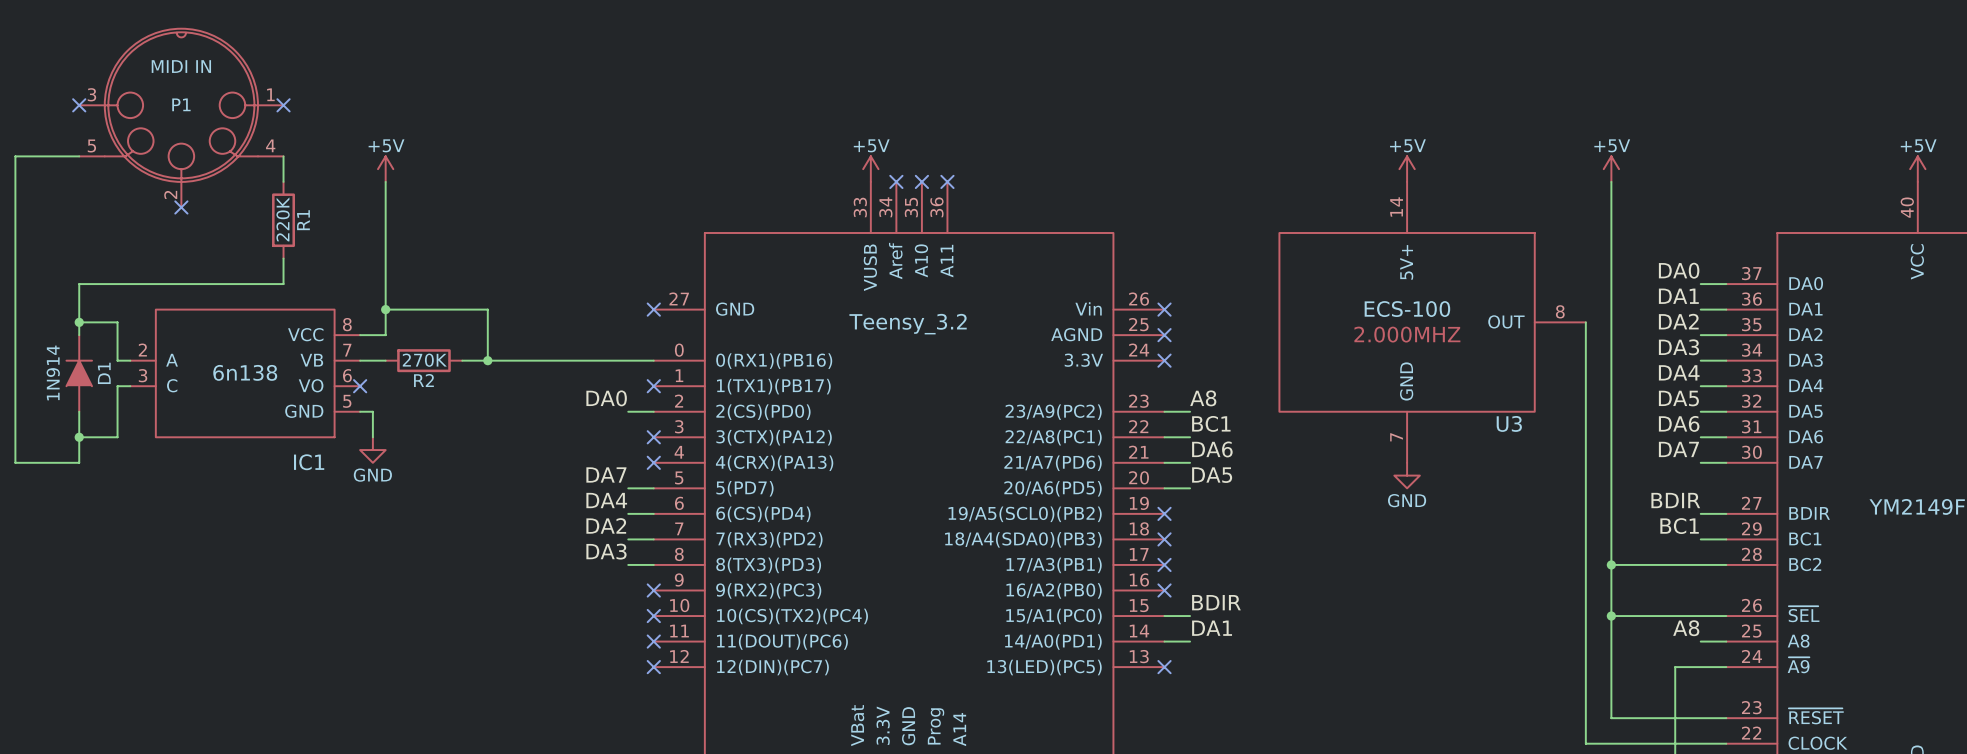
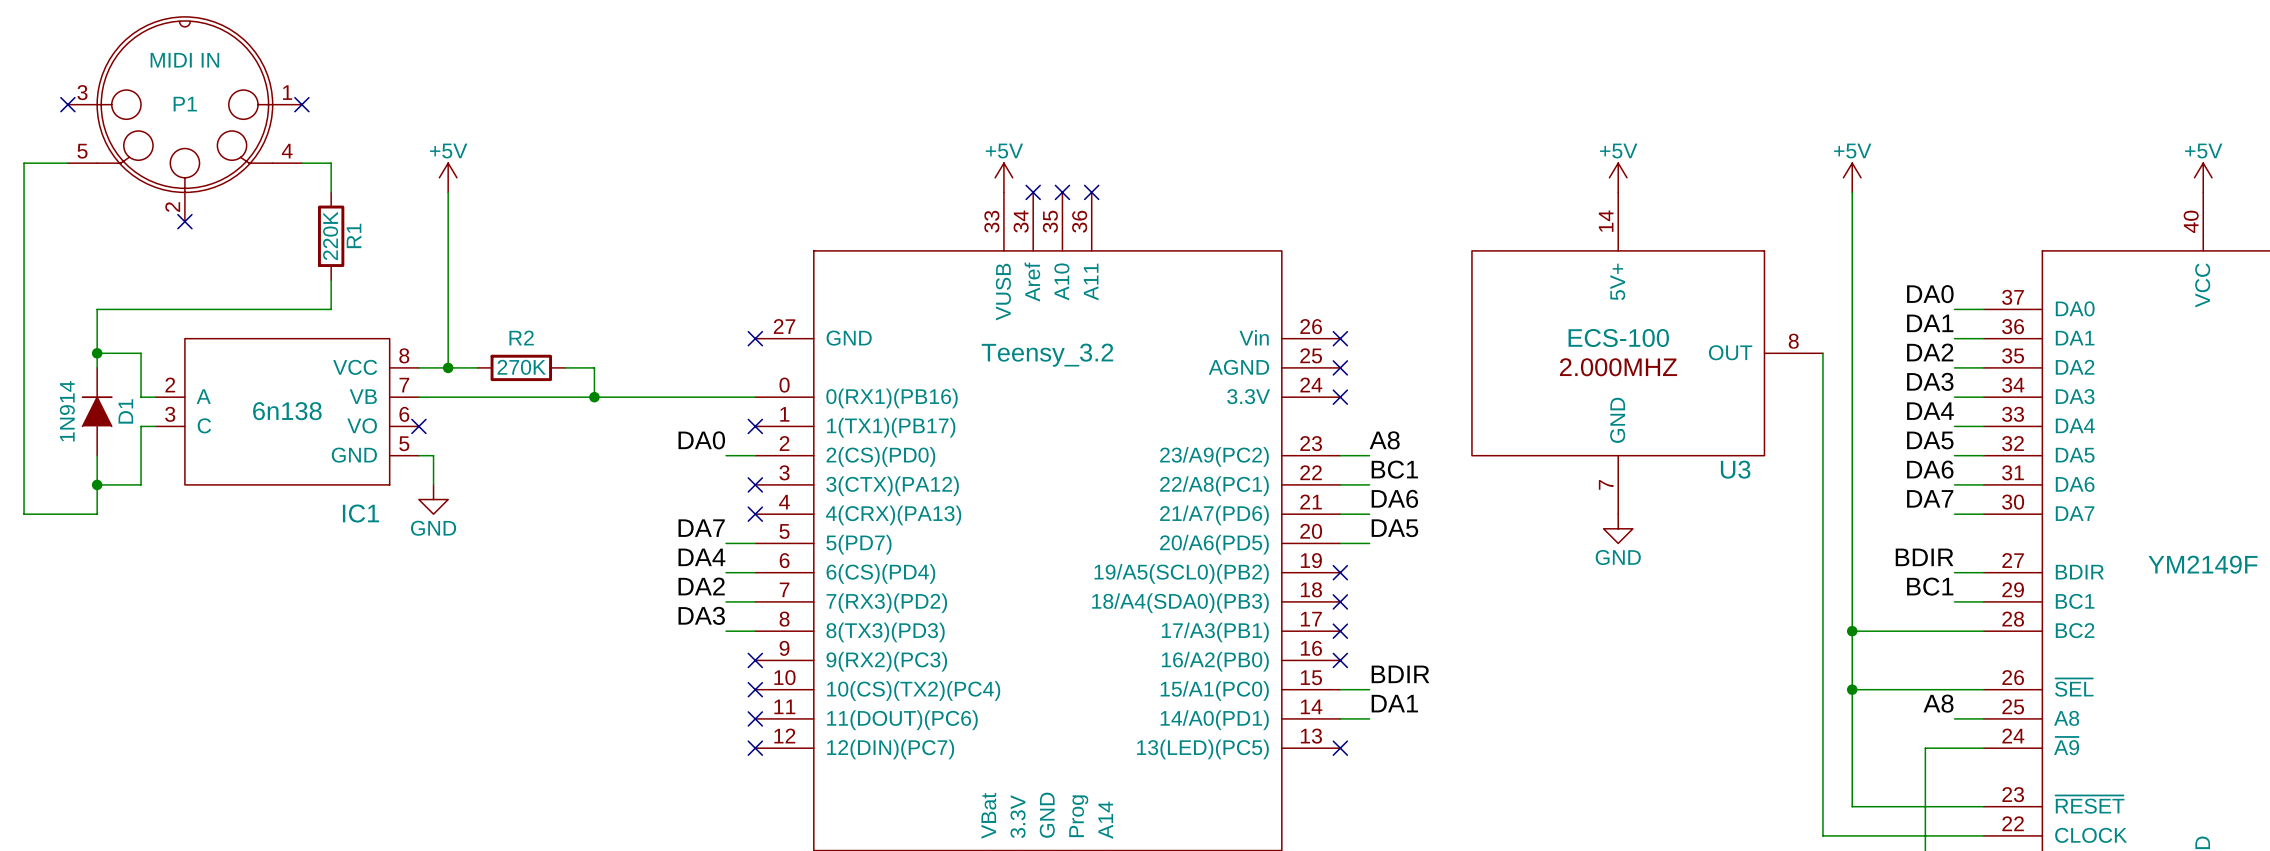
no-connect mark position: (79, 105) -> (67, 104)
no-connect mark position: (283, 105) -> (301, 104)
P1 position: (181, 118) -> (184, 119)
no-connect mark position: (181, 207) -> (184, 221)
wire: (385, 309) (487, 309) (487, 360) -> none
junction position: (385, 309) -> (448, 367)
wire: none -> (448, 367) (477, 367)
wire: none -> (565, 367) (594, 367) (594, 397)
R2 position: (423, 360) -> (521, 367)
junction position: (487, 360) -> (594, 397)
R2 name position: R2 (423, 380) -> R2 (521, 338)

